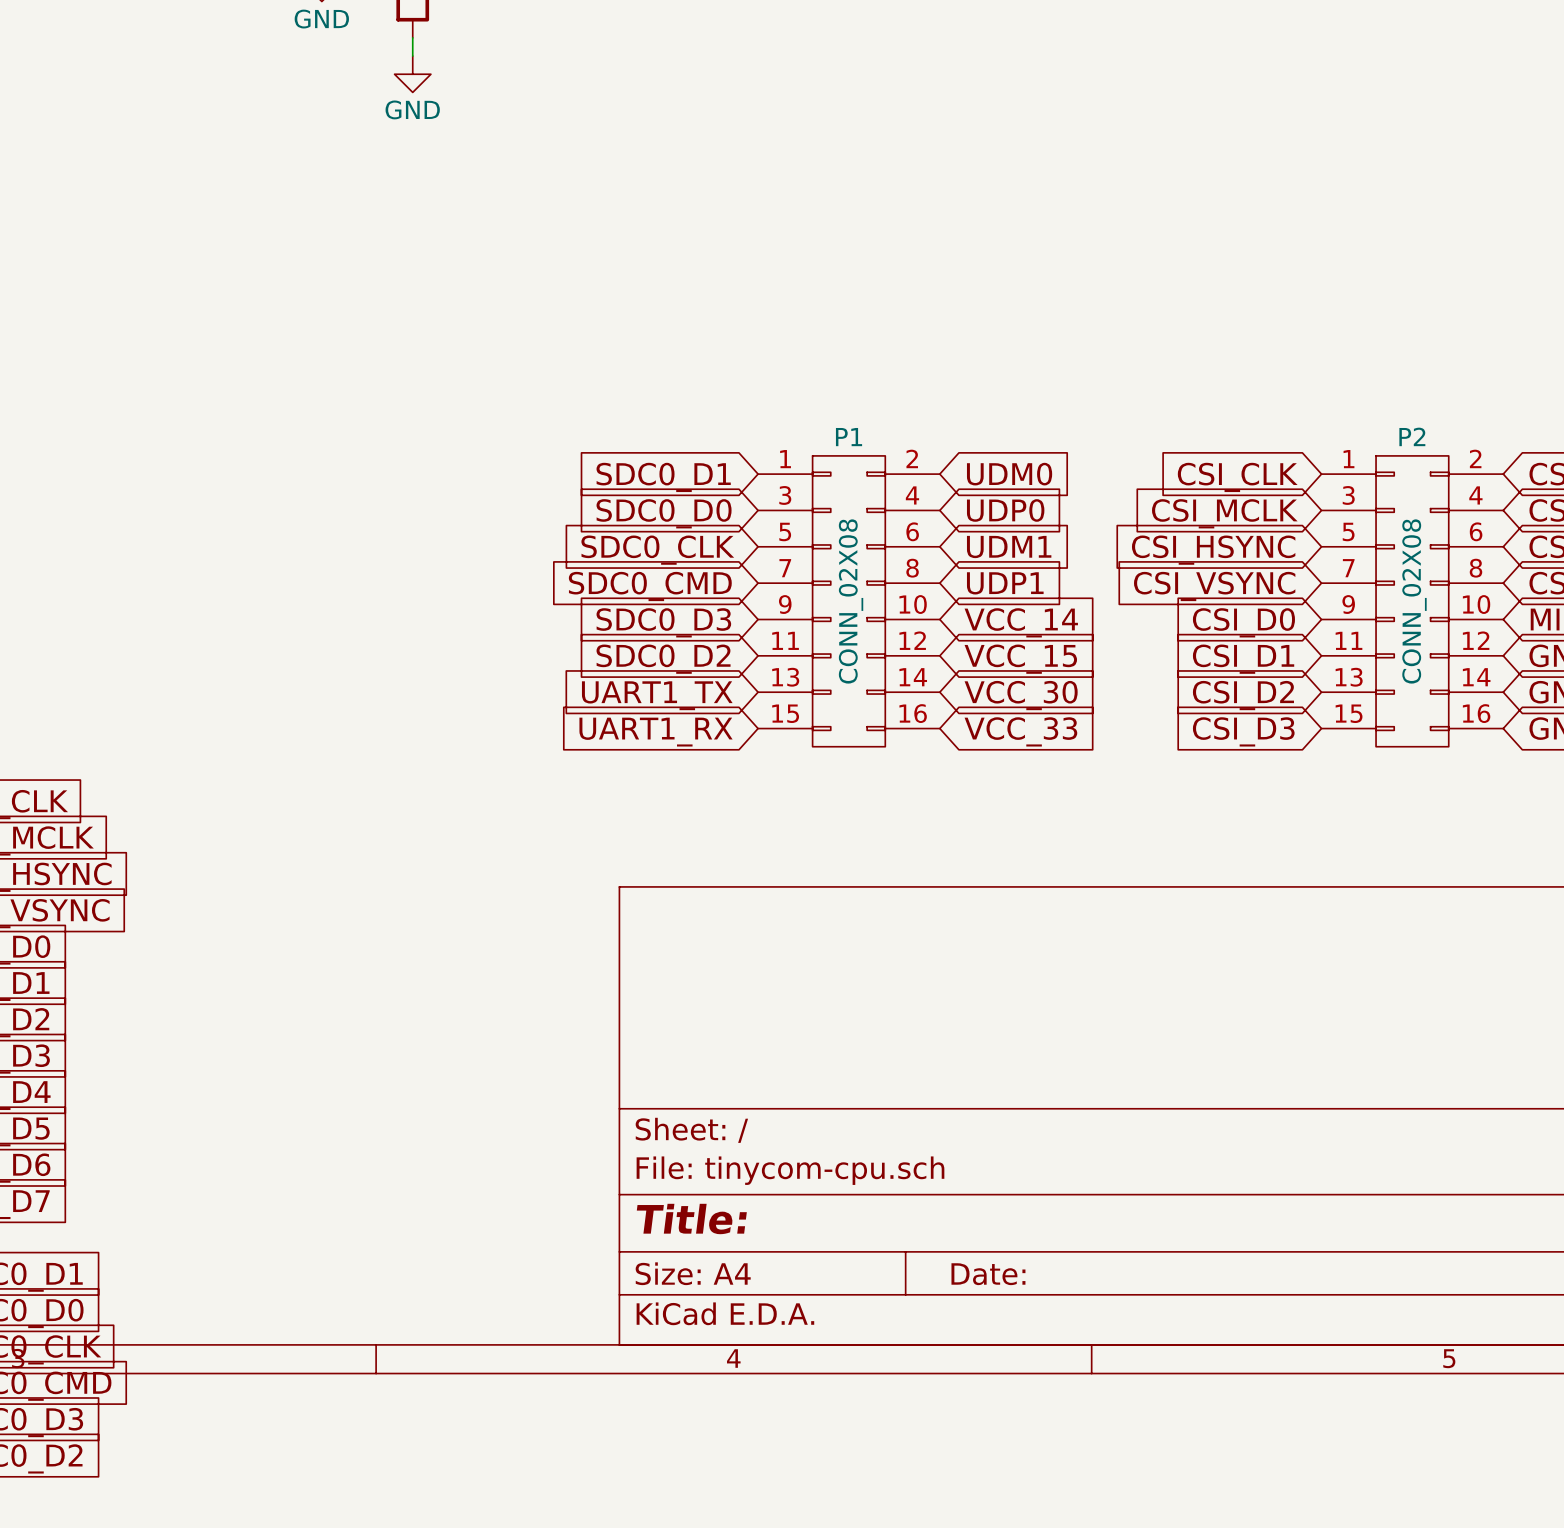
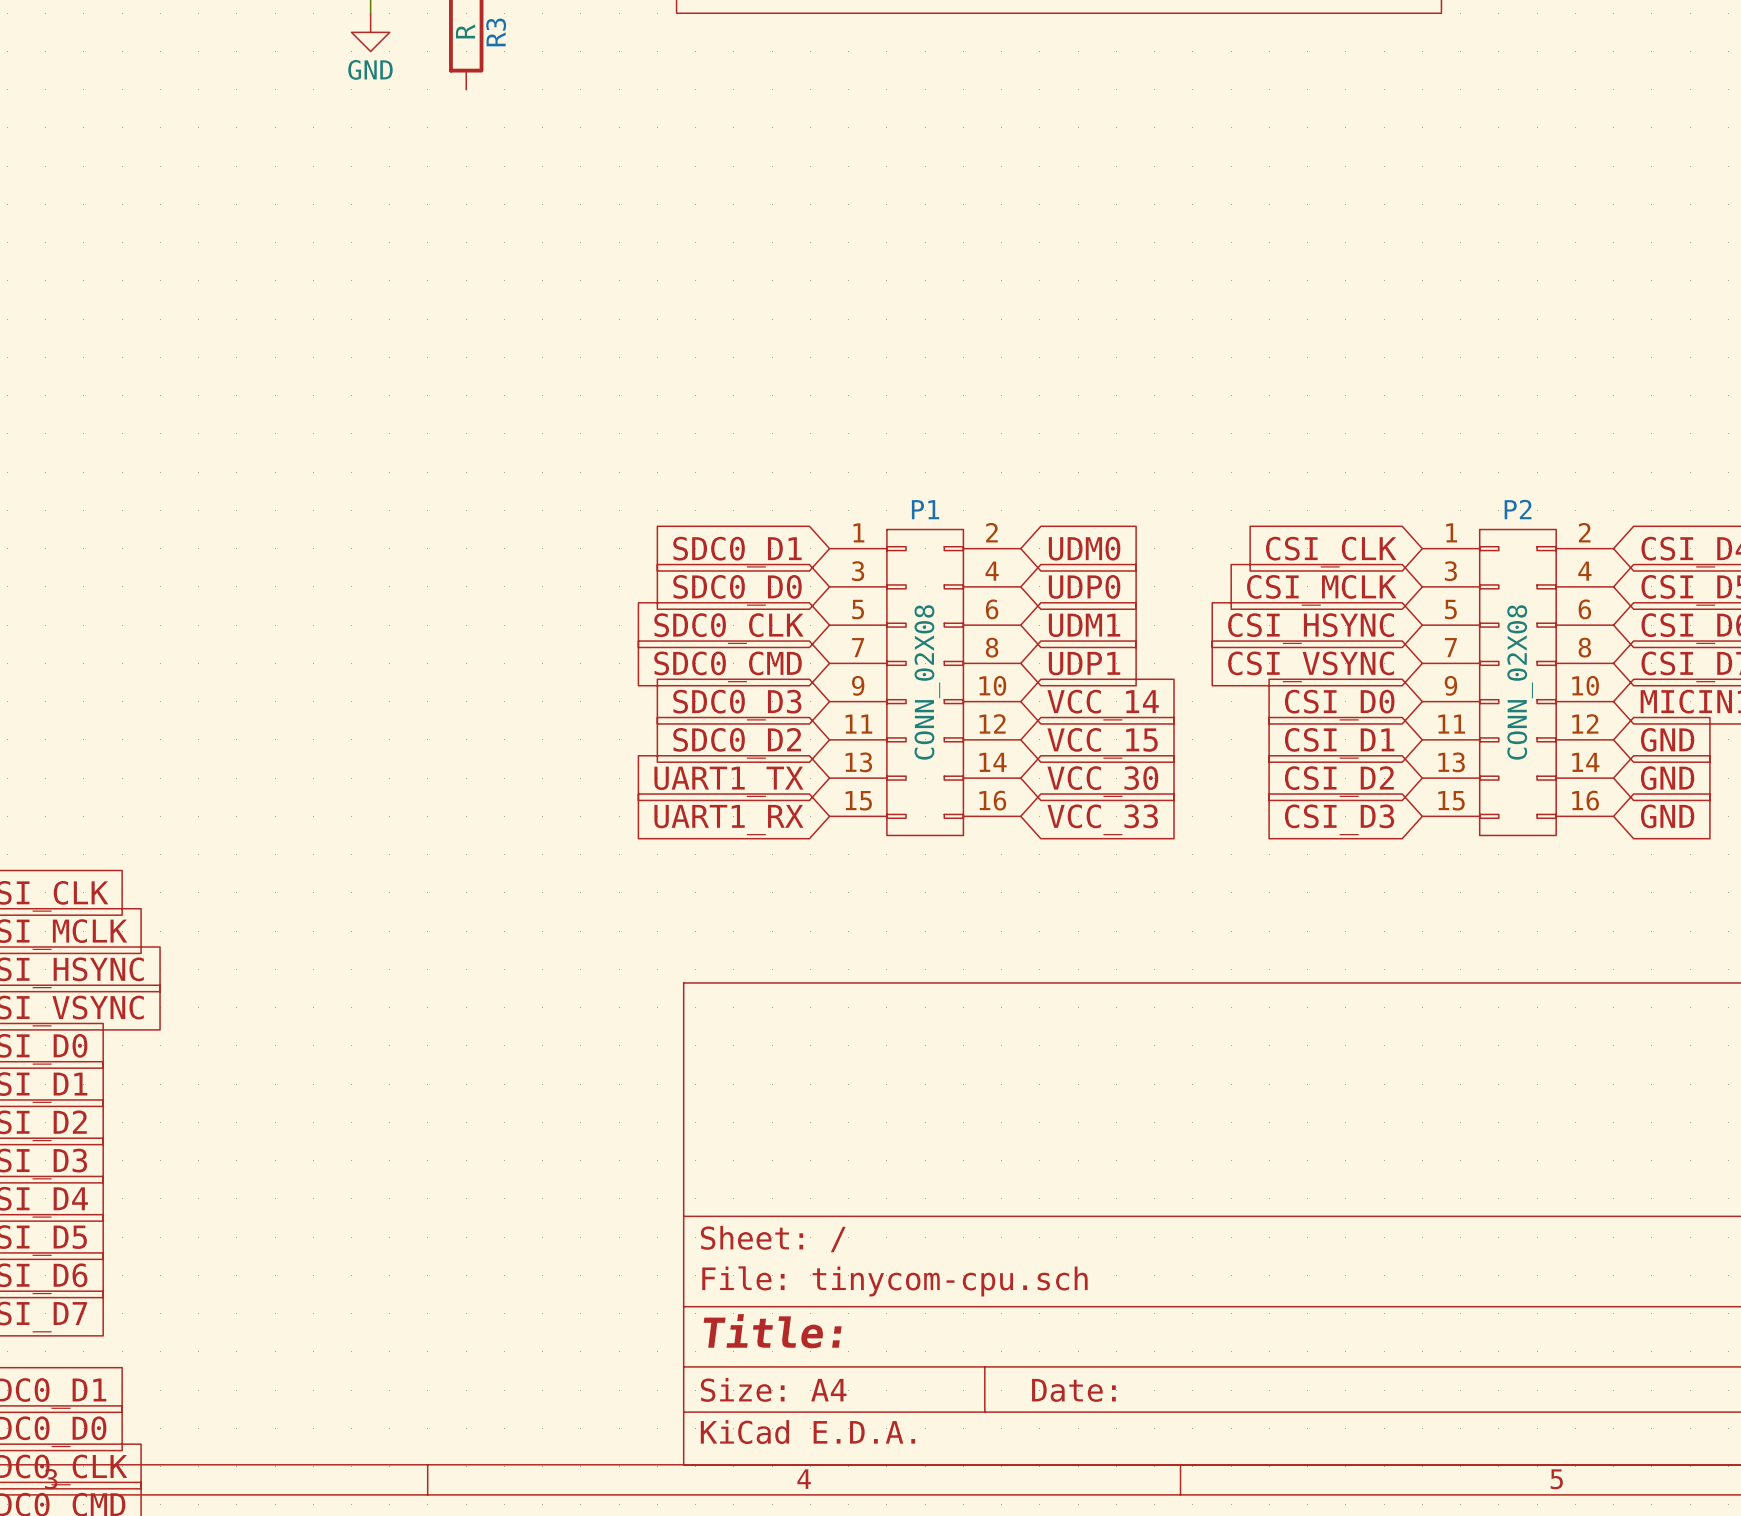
wire: (412, 37) (412, 56) -> none
power symbol: GND (412, 74) -> none

